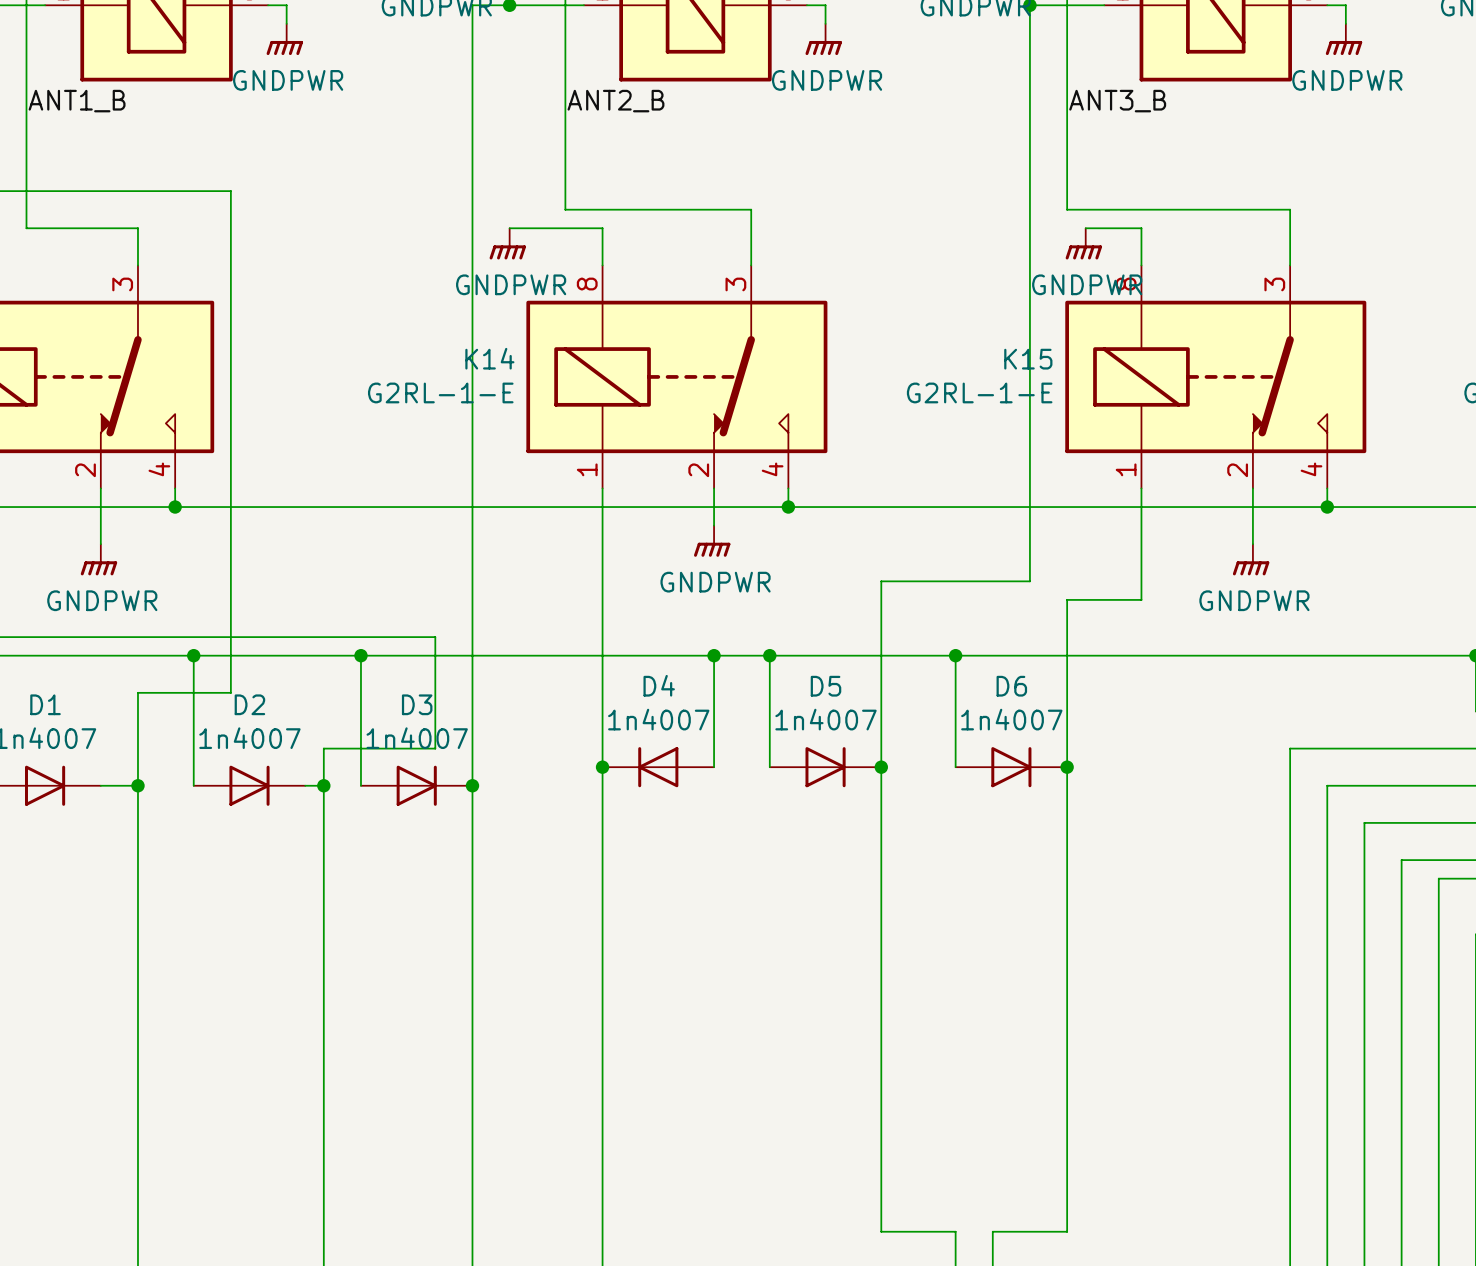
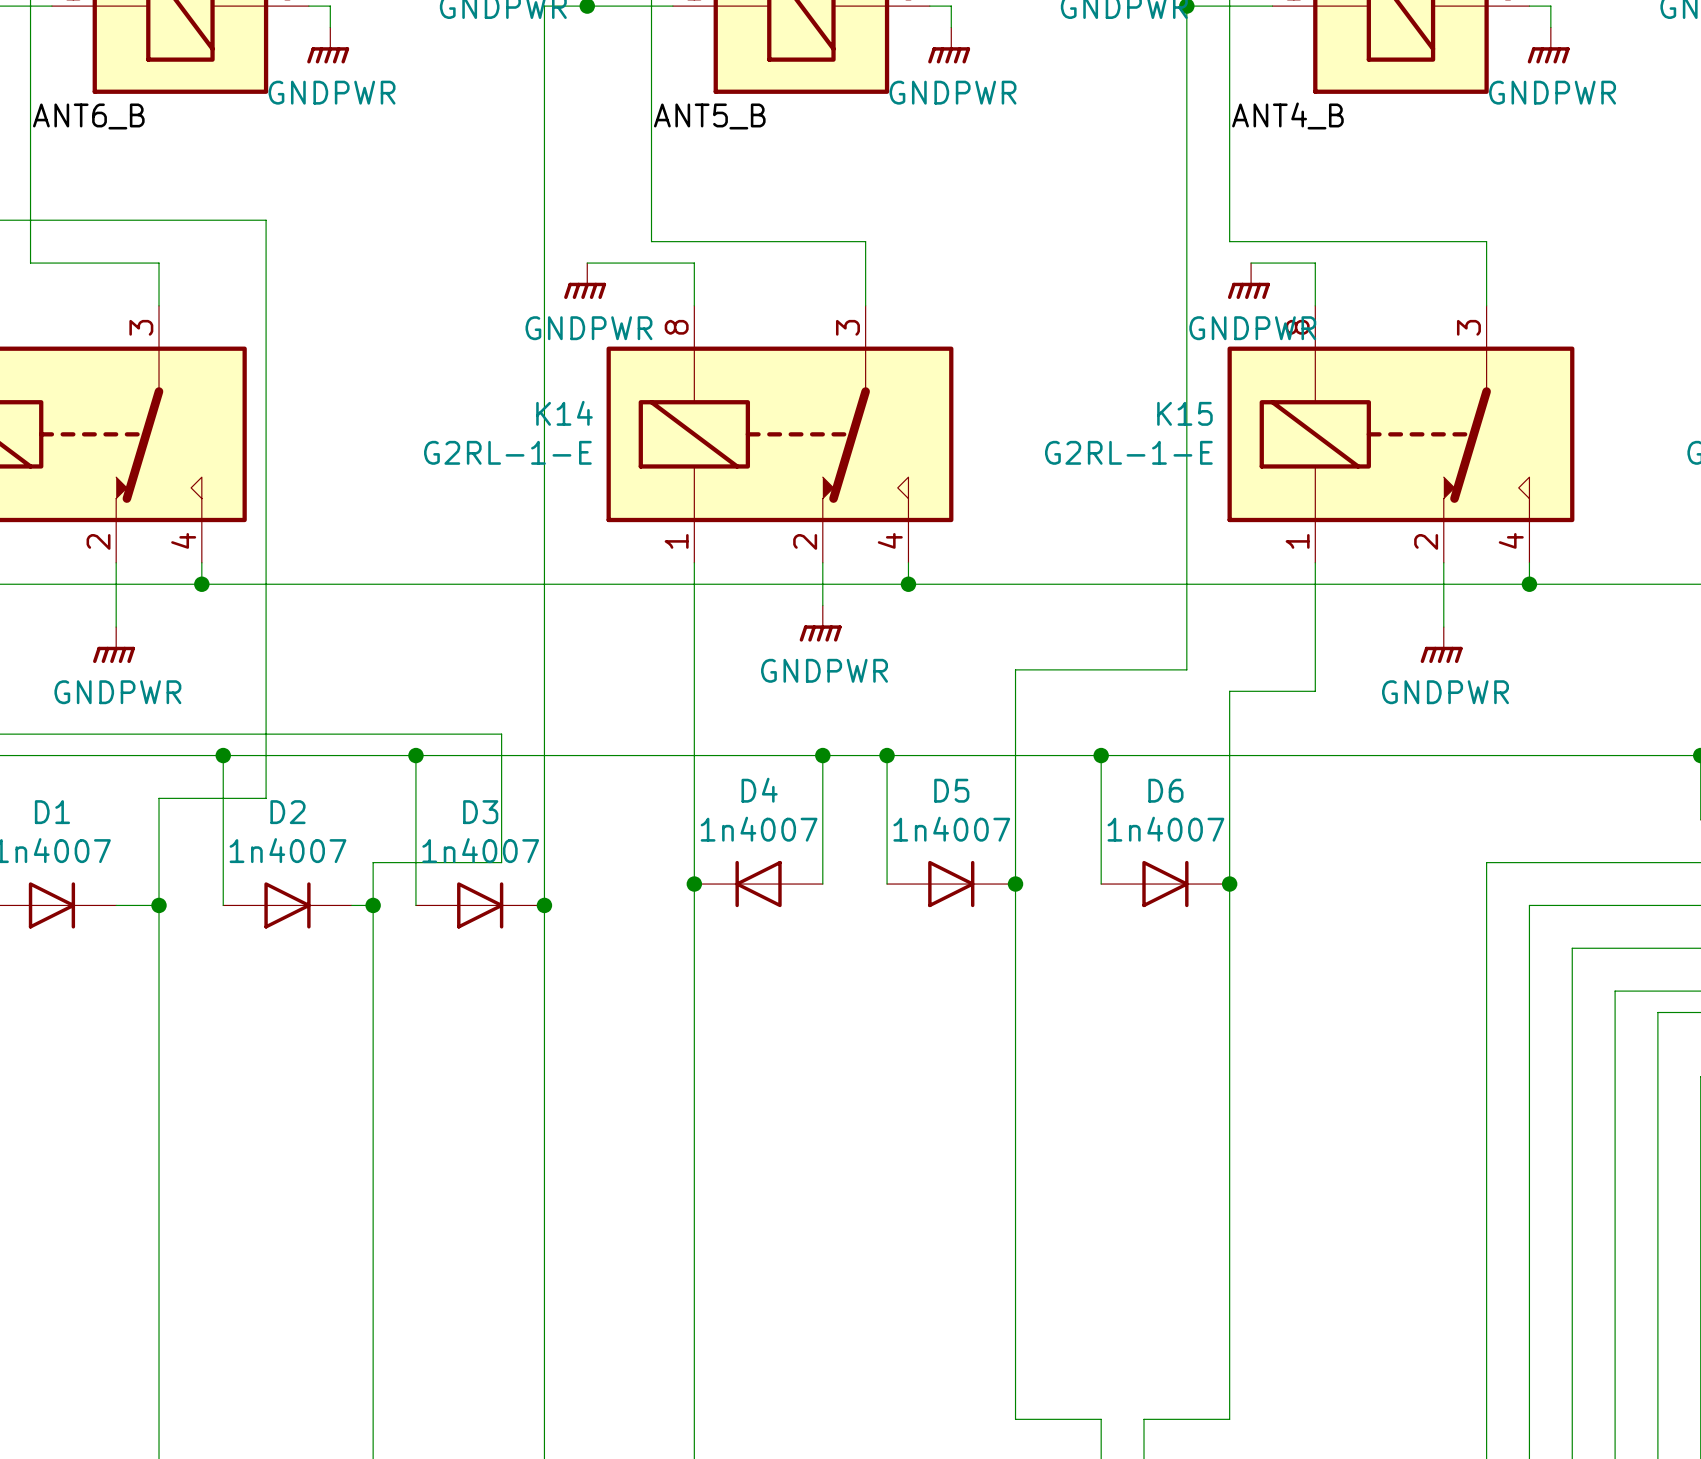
label: ANT1_B (77, 101) -> ANT6_B (88, 116)
label: ANT2_B (615, 101) -> ANT5_B (709, 116)
label: ANT3_B (1117, 101) -> ANT4_B (1287, 115)

